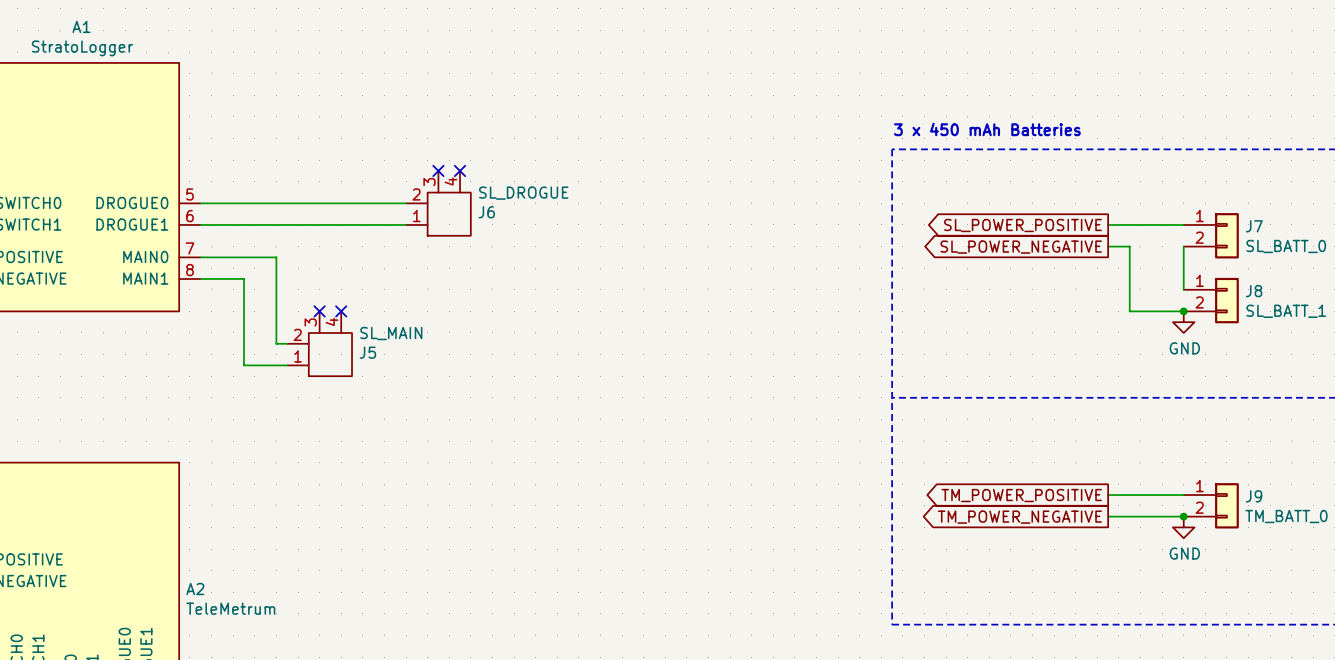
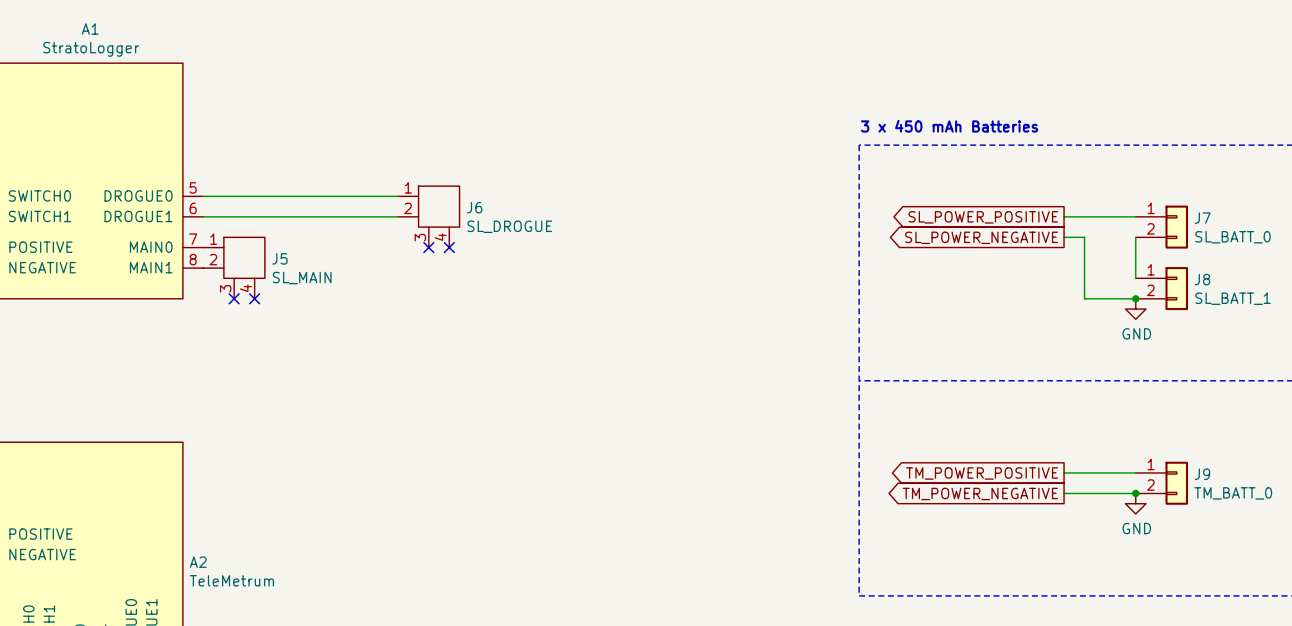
no-connect mark: (438, 170) -> none
no-connect mark: (460, 170) -> none
J6 flip: as is (449, 214) -> up-down (439, 206)
wire: (200, 257) (276, 257) (276, 343) (287, 343) -> none
no-connect mark: none -> (428, 247)
no-connect mark: none -> (449, 247)
wire: (200, 278) (243, 278) (243, 365) (287, 365) -> none
no-connect mark: none -> (234, 298)
no-connect mark: none -> (254, 298)
no-connect mark: (319, 311) -> none
no-connect mark: (341, 311) -> none
J5 position: (319, 343) -> (234, 268)
J5 flip: as is (330, 354) -> up-down (244, 257)

